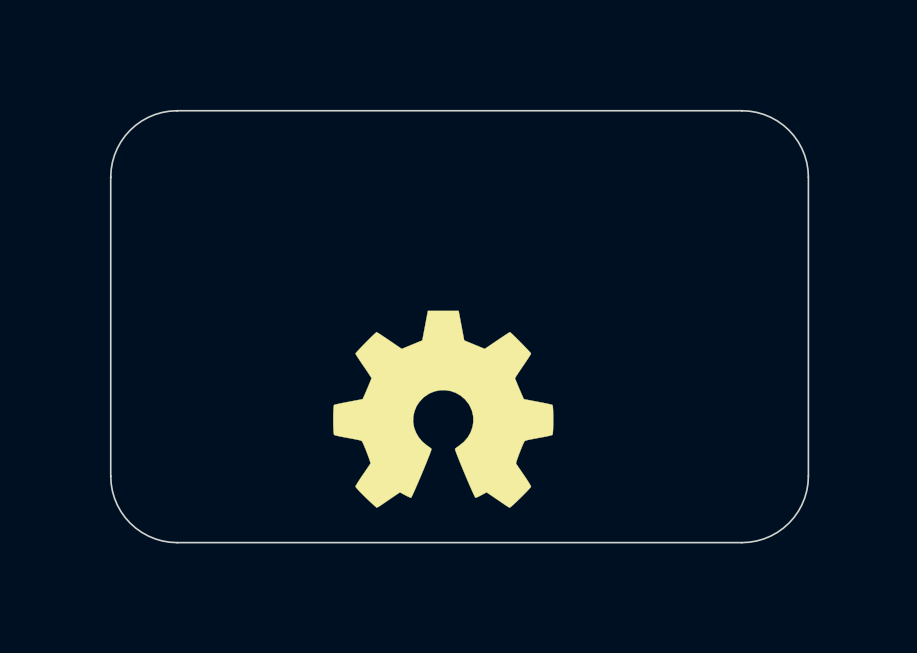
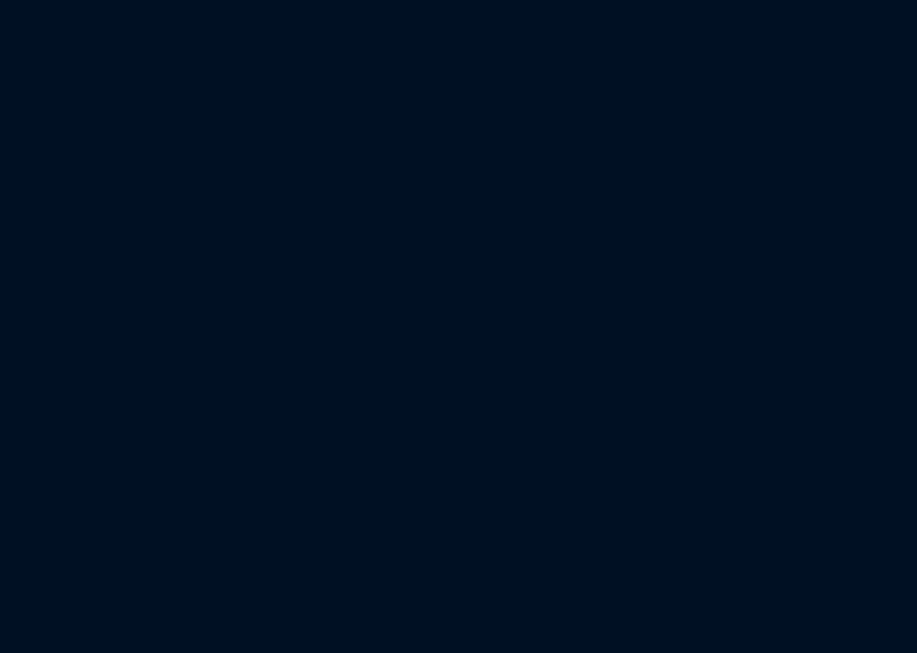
board edge: (177, 110) (741, 110) (756, 112) (777, 120) (788, 130) (798, 141) (804, 155) (808, 177) (808, 476) (804, 498) (798, 511) (788, 523) (770, 536) (756, 540) (741, 542) (177, 542) (155, 538) (141, 532) (130, 523) (120, 511) (114, 498) (111, 483) (111, 169) (117, 148) (130, 130) (148, 117) (162, 112) (177, 110) -> none
drawing: [333, 310, 554, 508] -> none

